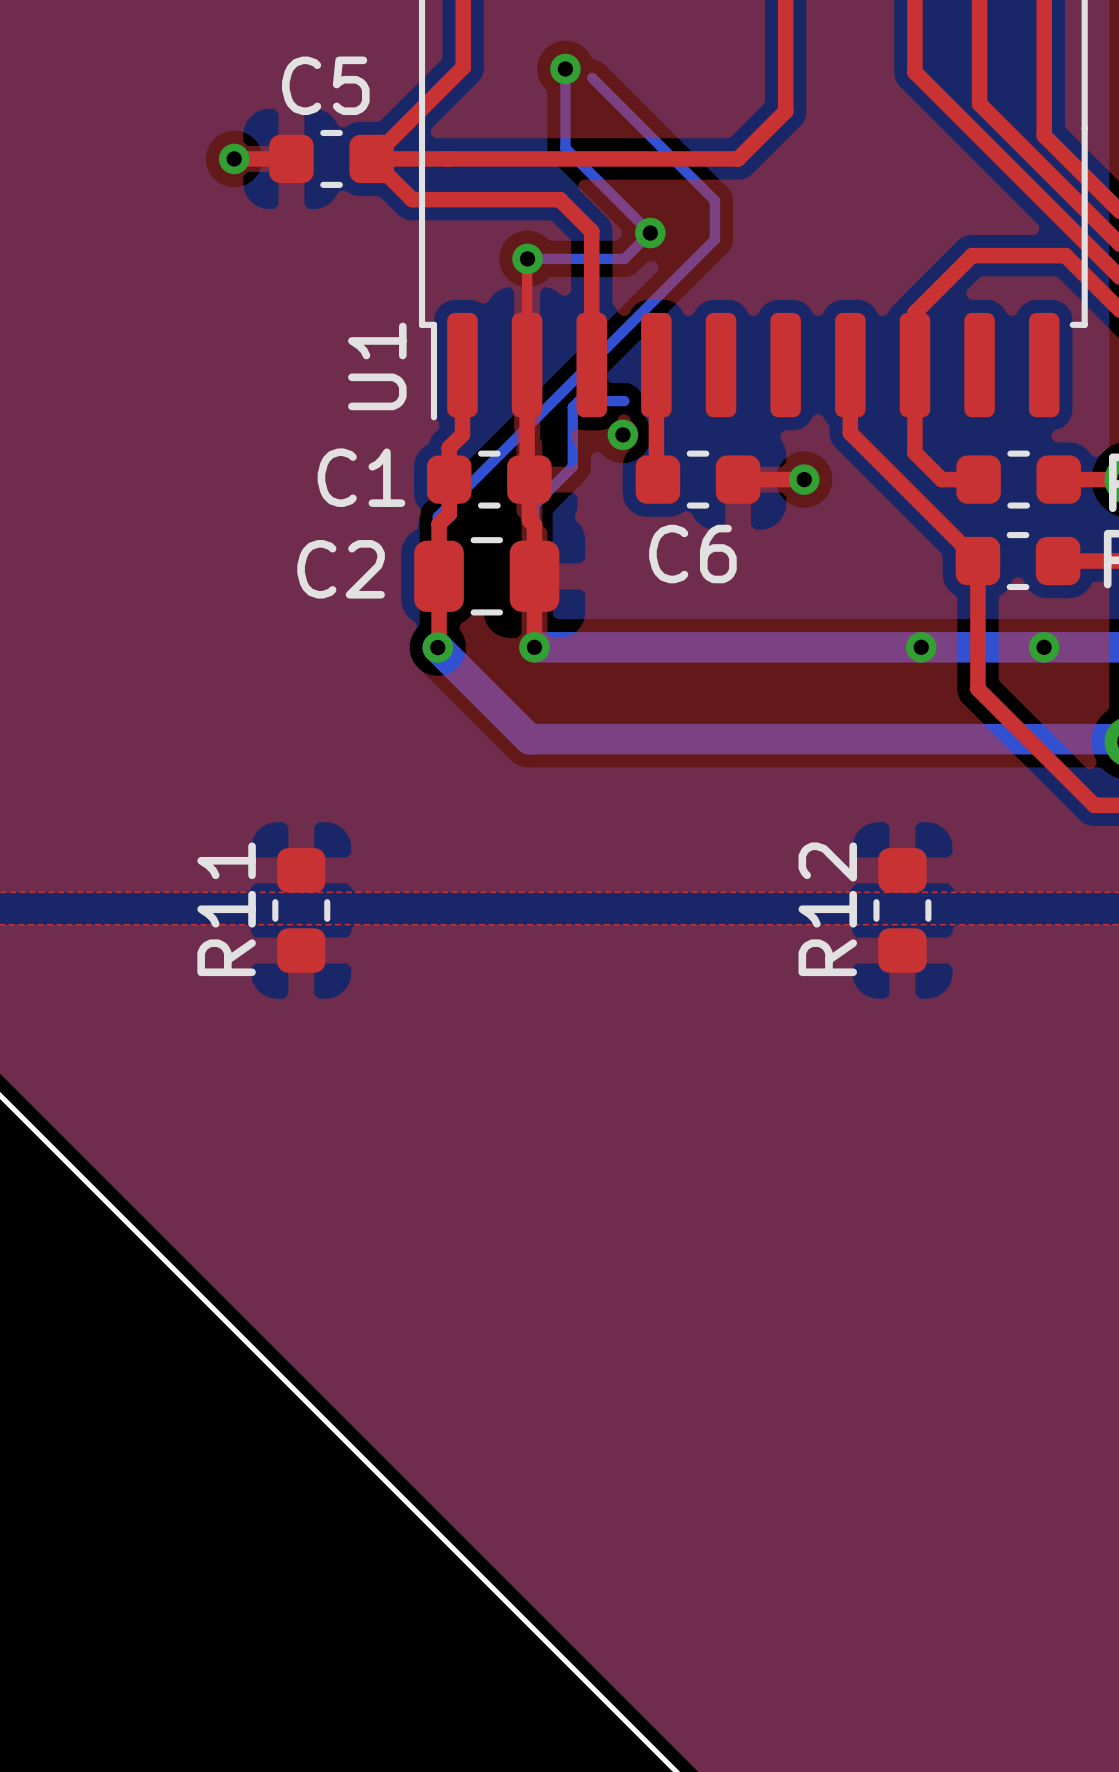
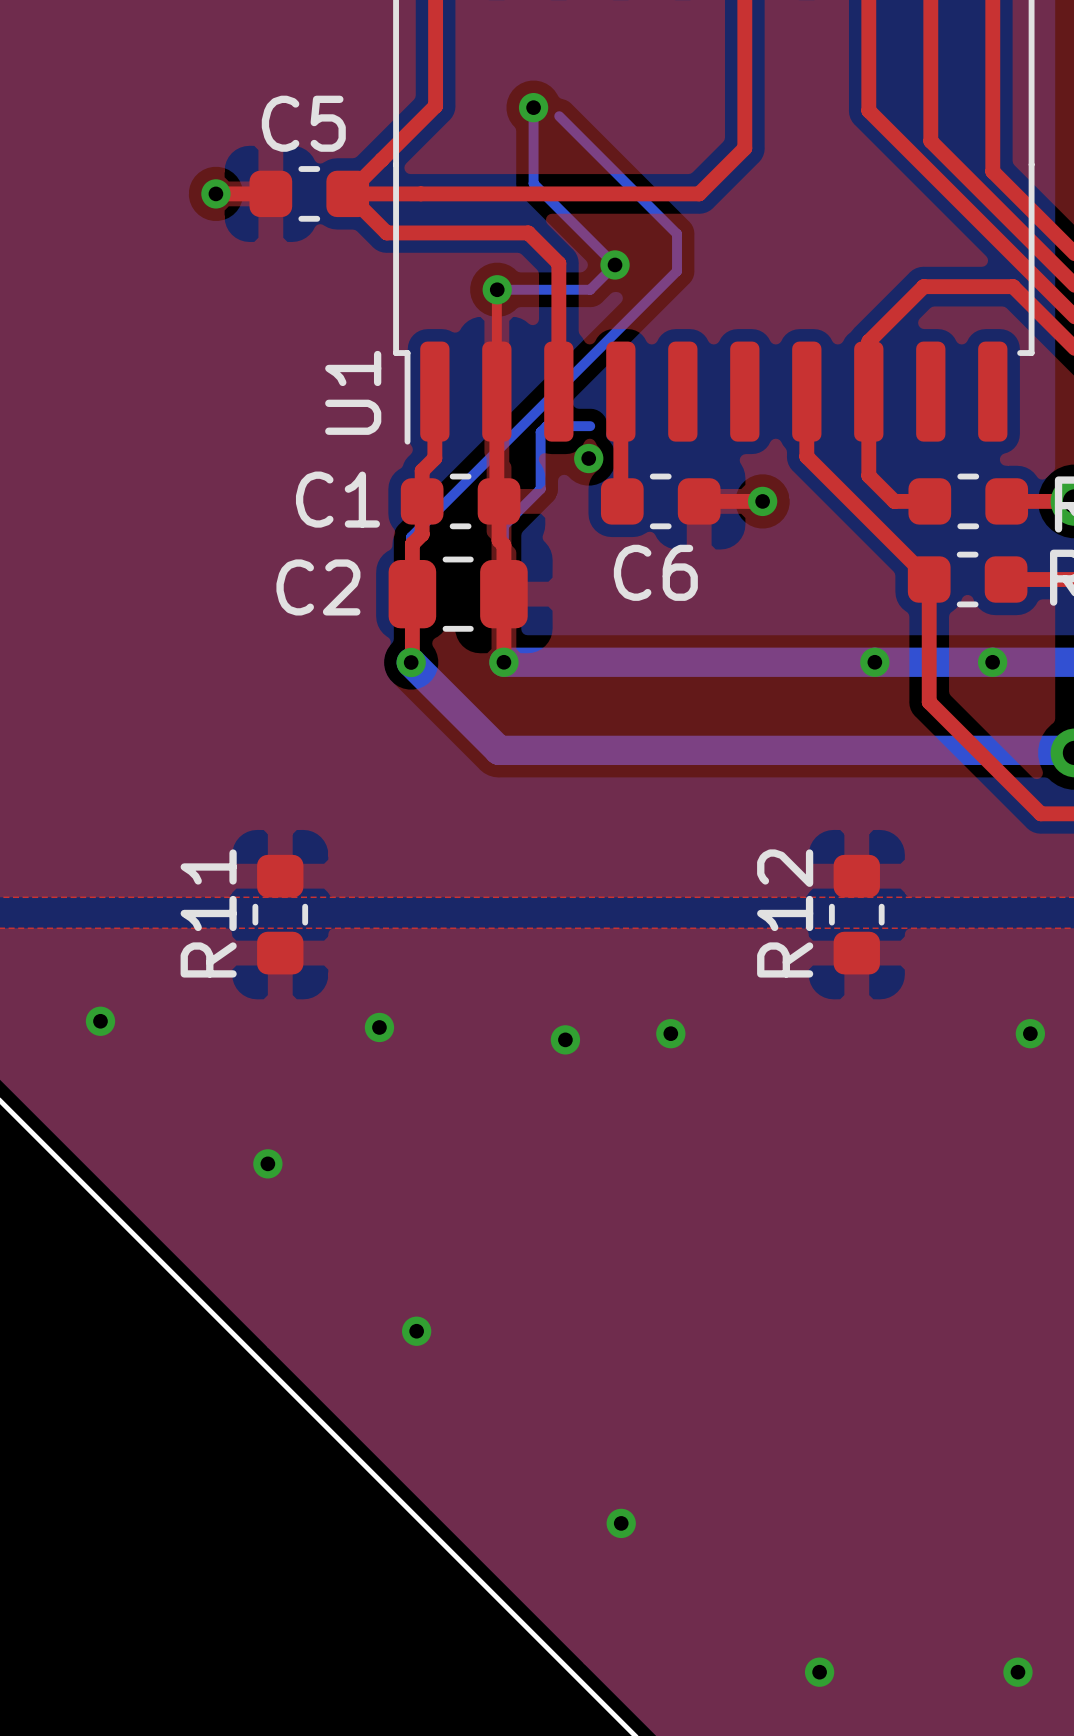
via: none -> (100, 1021)
via: none -> (379, 1027)
via: none -> (670, 1033)
via: none -> (1030, 1033)
via: none -> (565, 1039)
via: none -> (267, 1163)
via: none -> (416, 1331)
via: none -> (621, 1523)
via: none -> (819, 1672)
via: none -> (1017, 1672)

